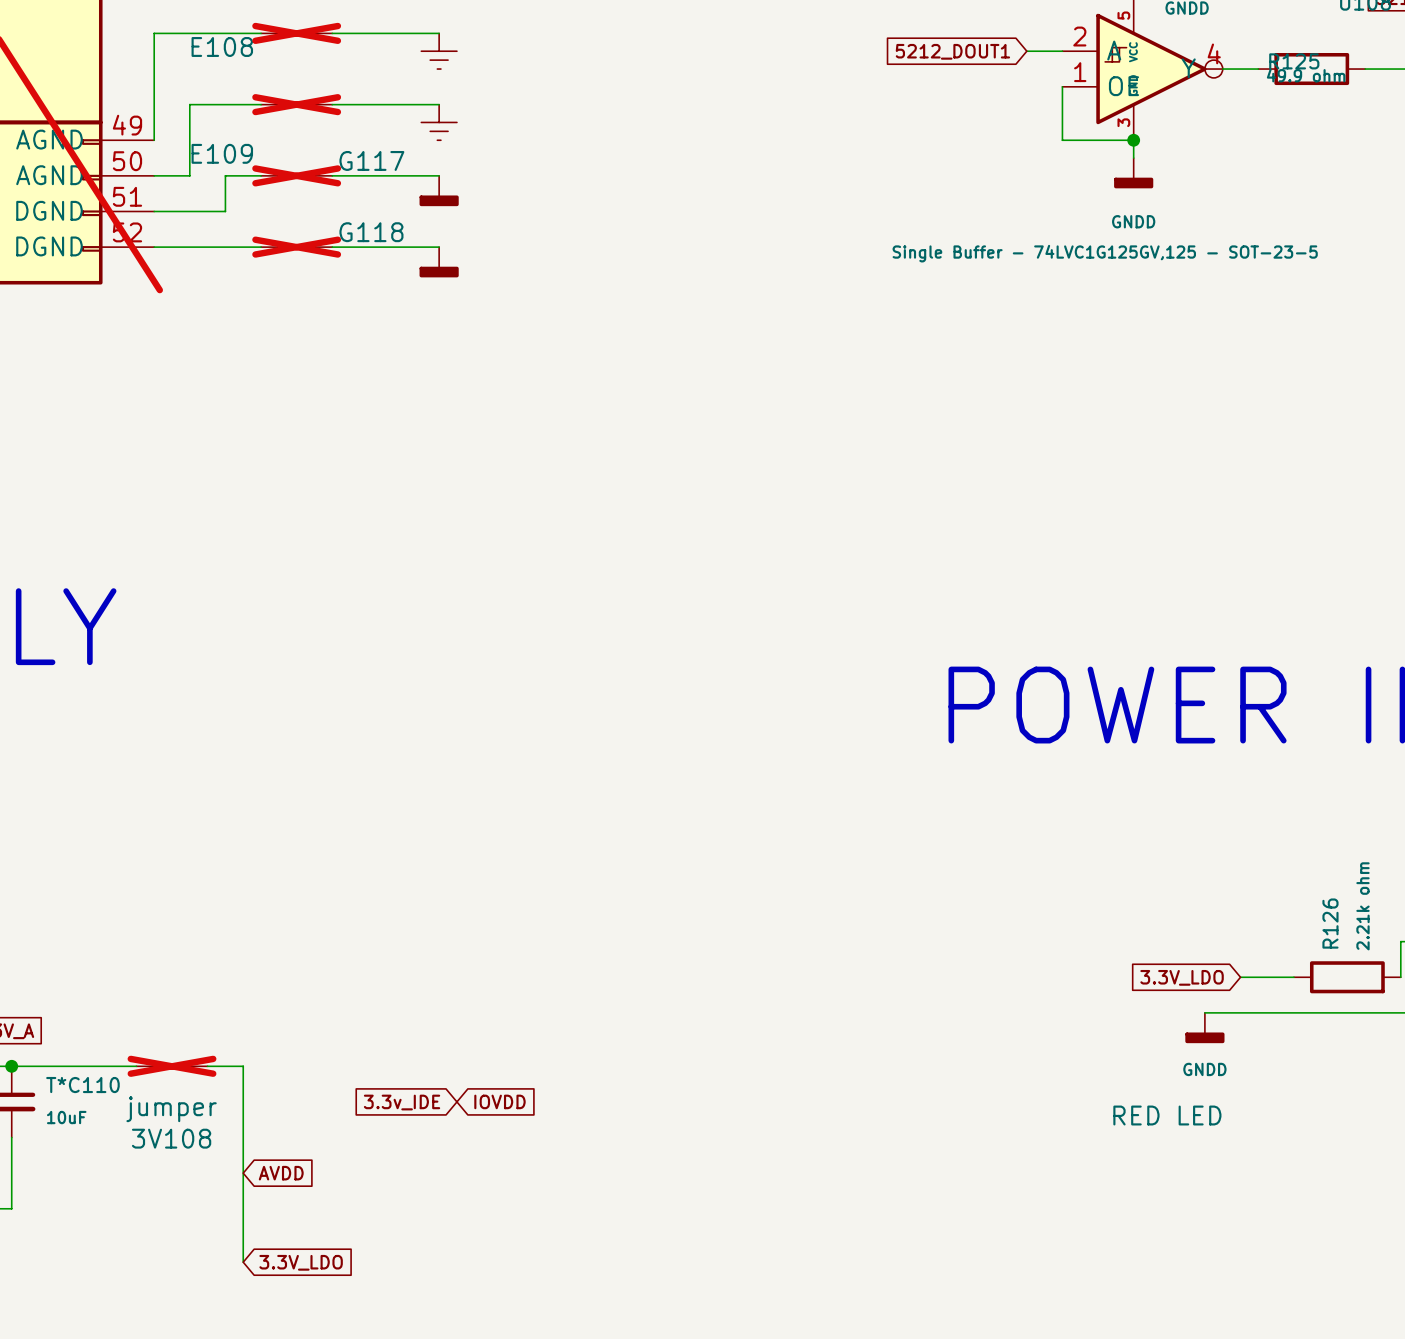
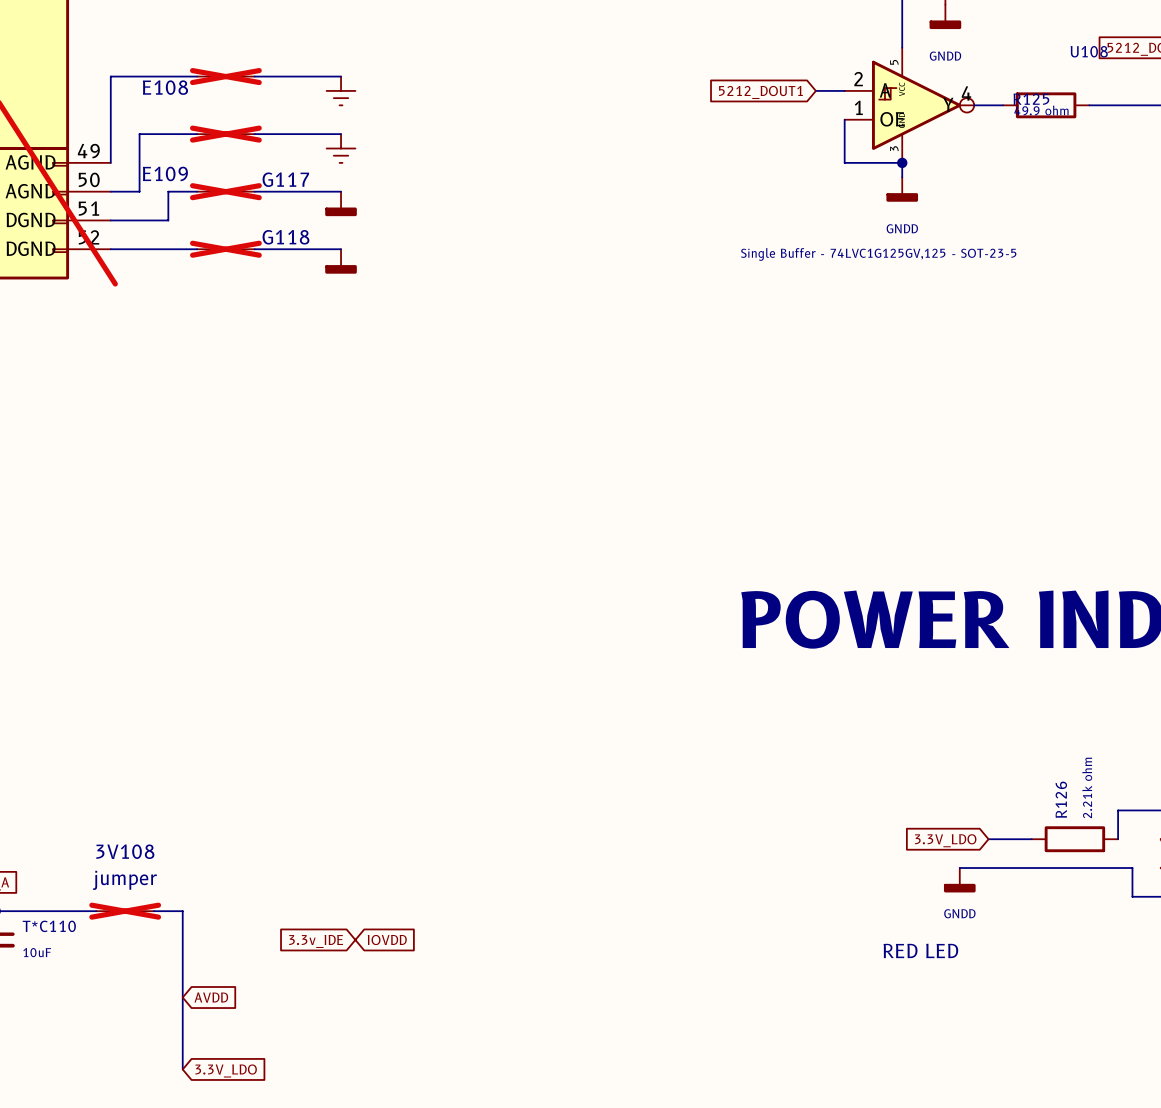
3V108 value position: jumper (171, 1109) -> jumper (124, 880)
3V108 name position: 3V108 (171, 1138) -> 3V108 (125, 851)

